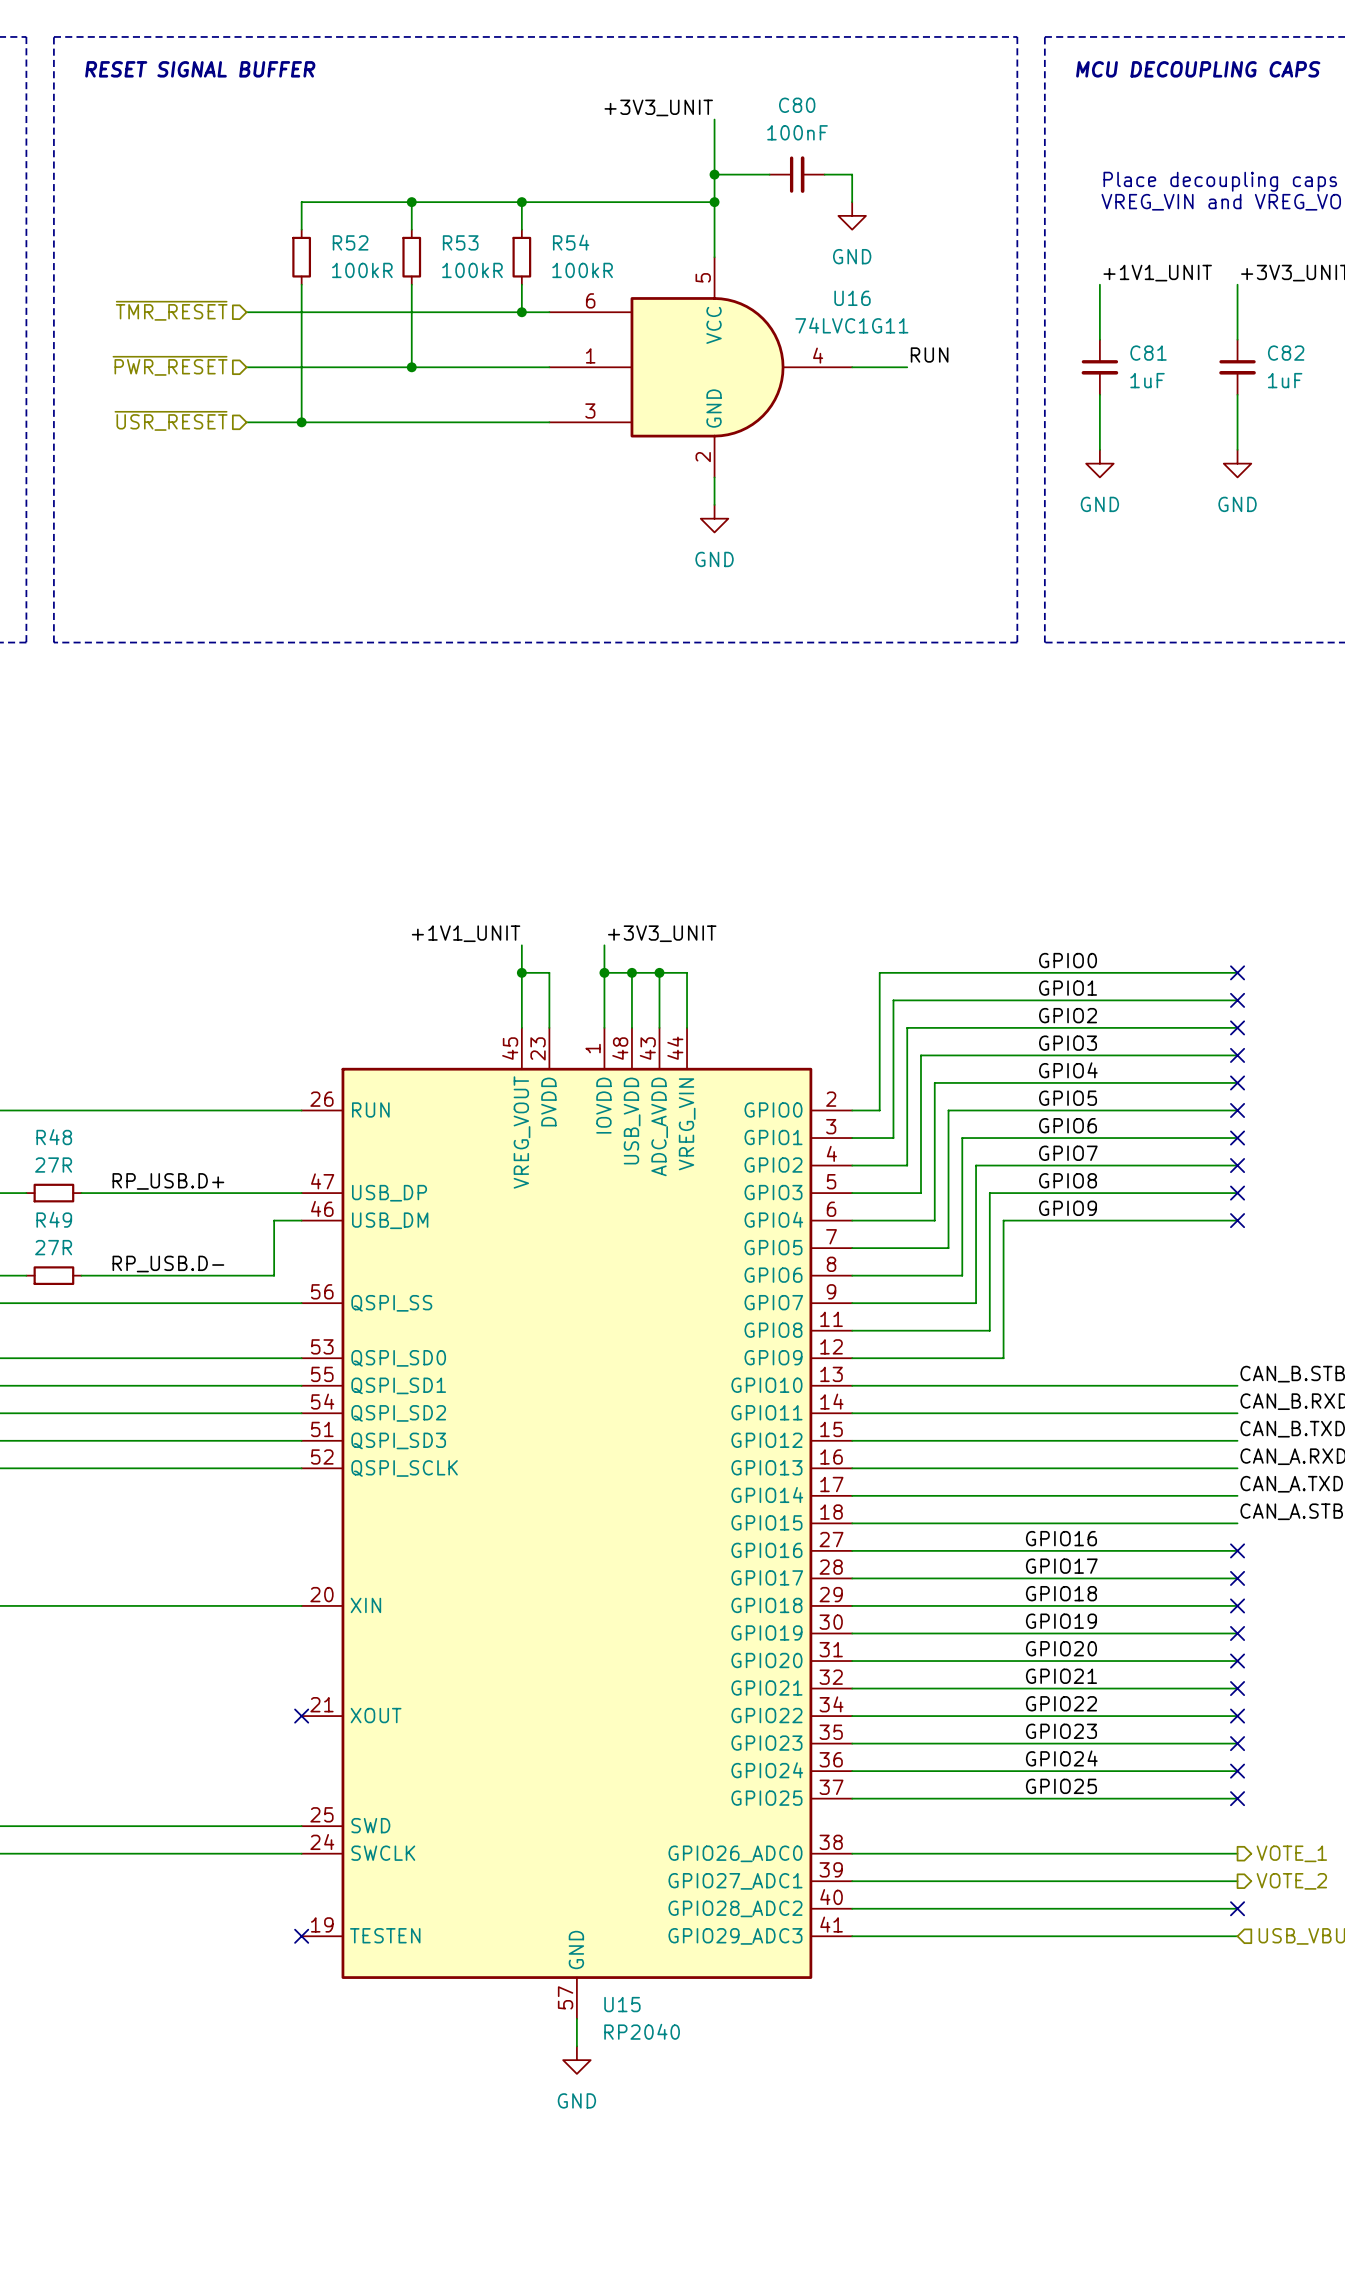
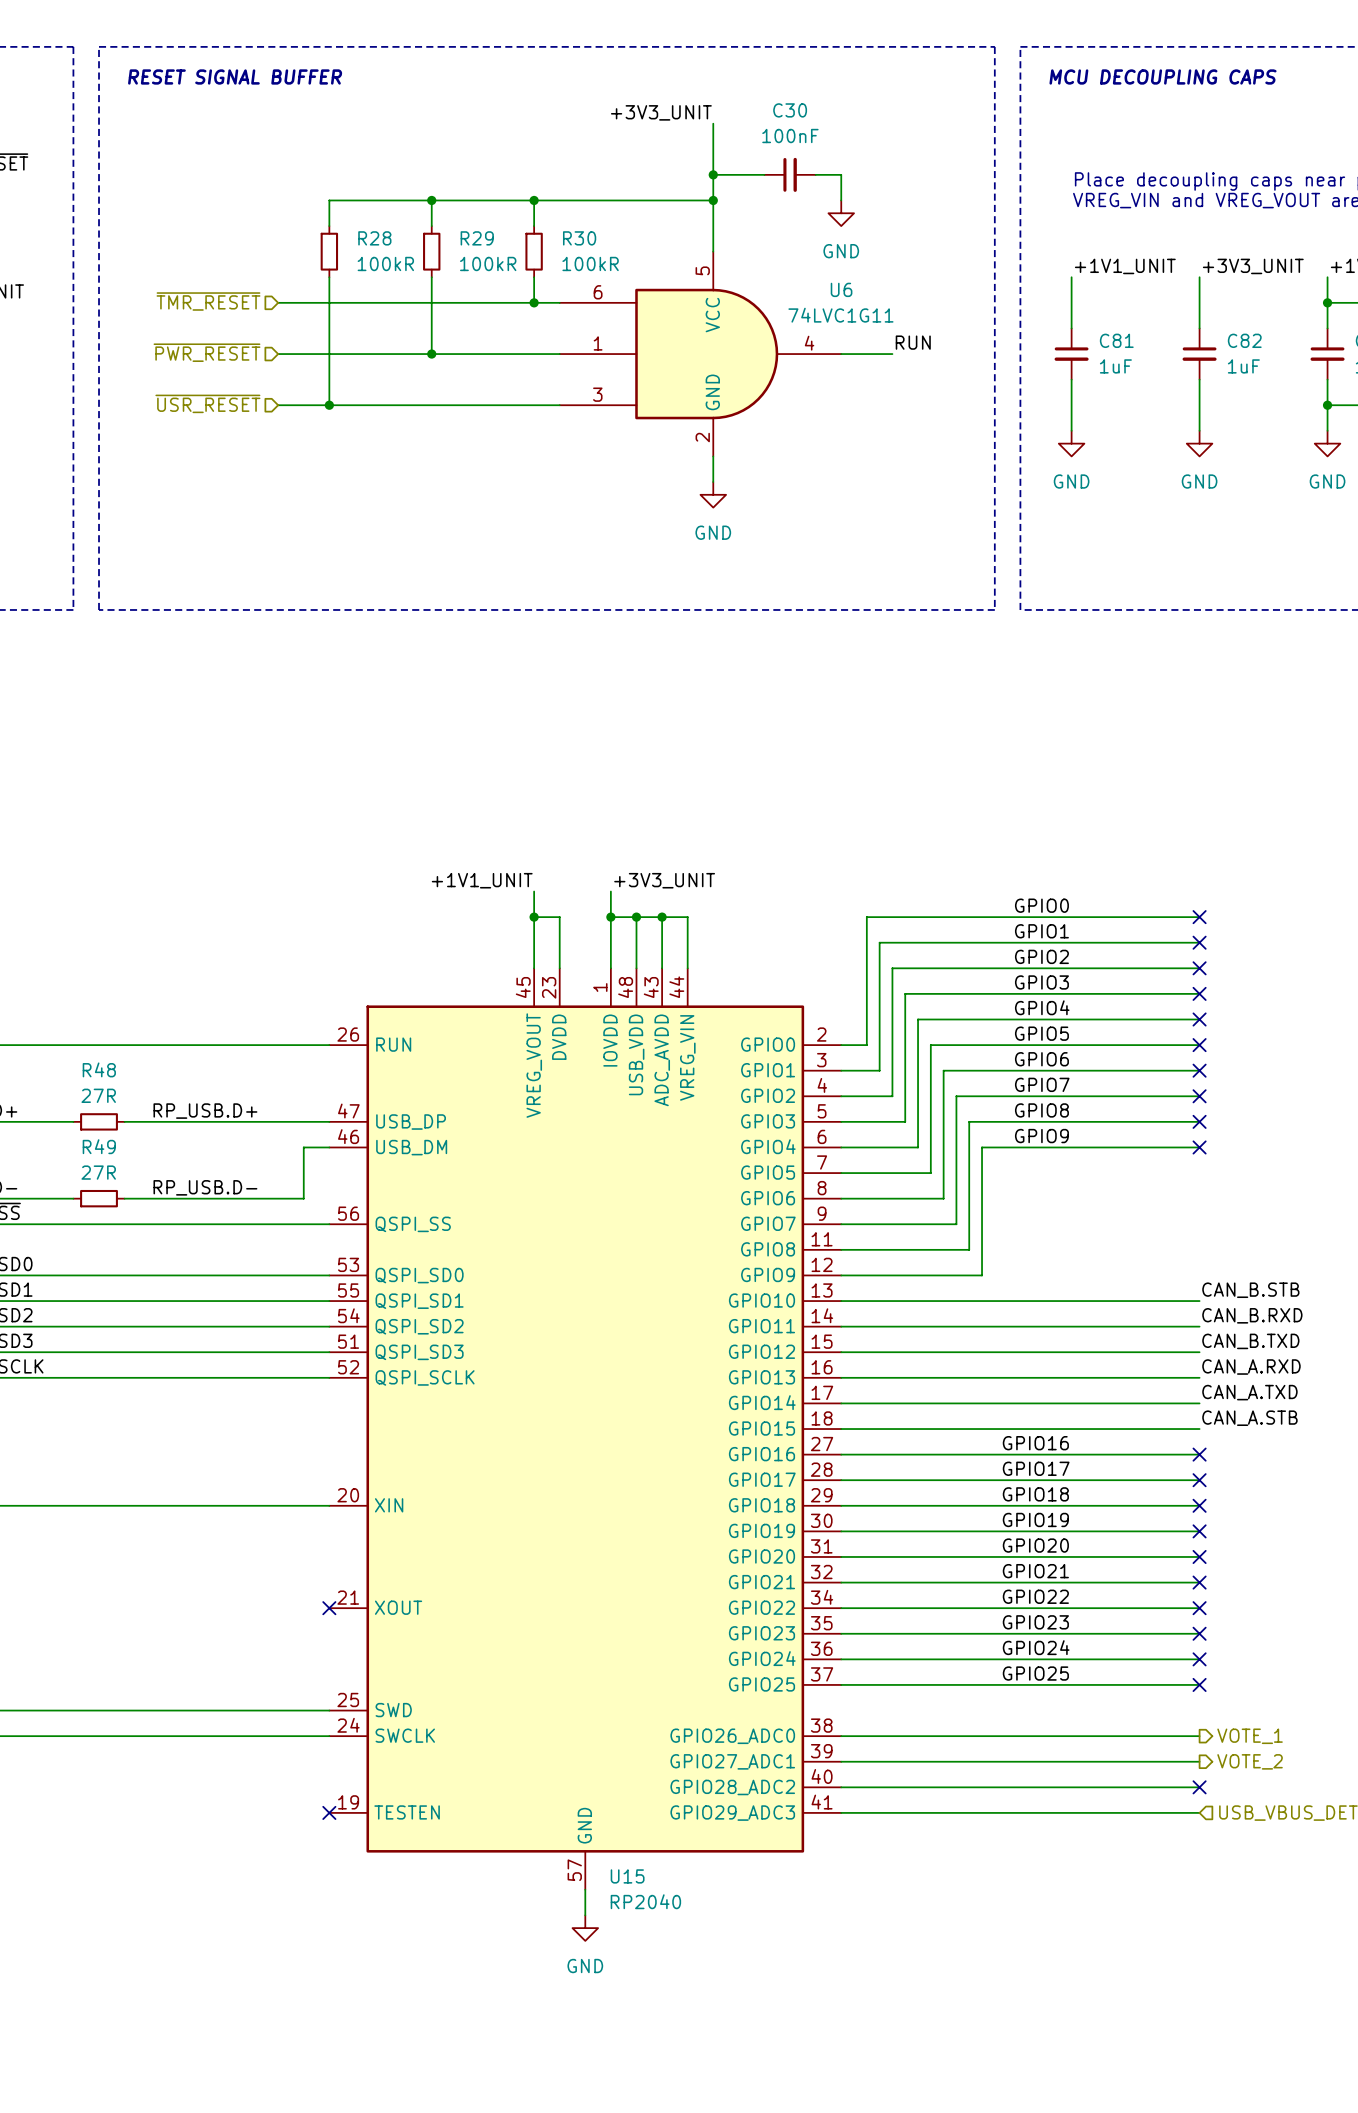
C80 name: C80 (797, 105) -> C30 (790, 110)
R52 name: R52 (350, 242) -> R28 (374, 238)
R53 name: R53 (460, 242) -> R29 (477, 238)
R54 name: R54 (571, 242) -> R30 (579, 238)
U16 name: U16 (852, 298) -> U6 (841, 289)

